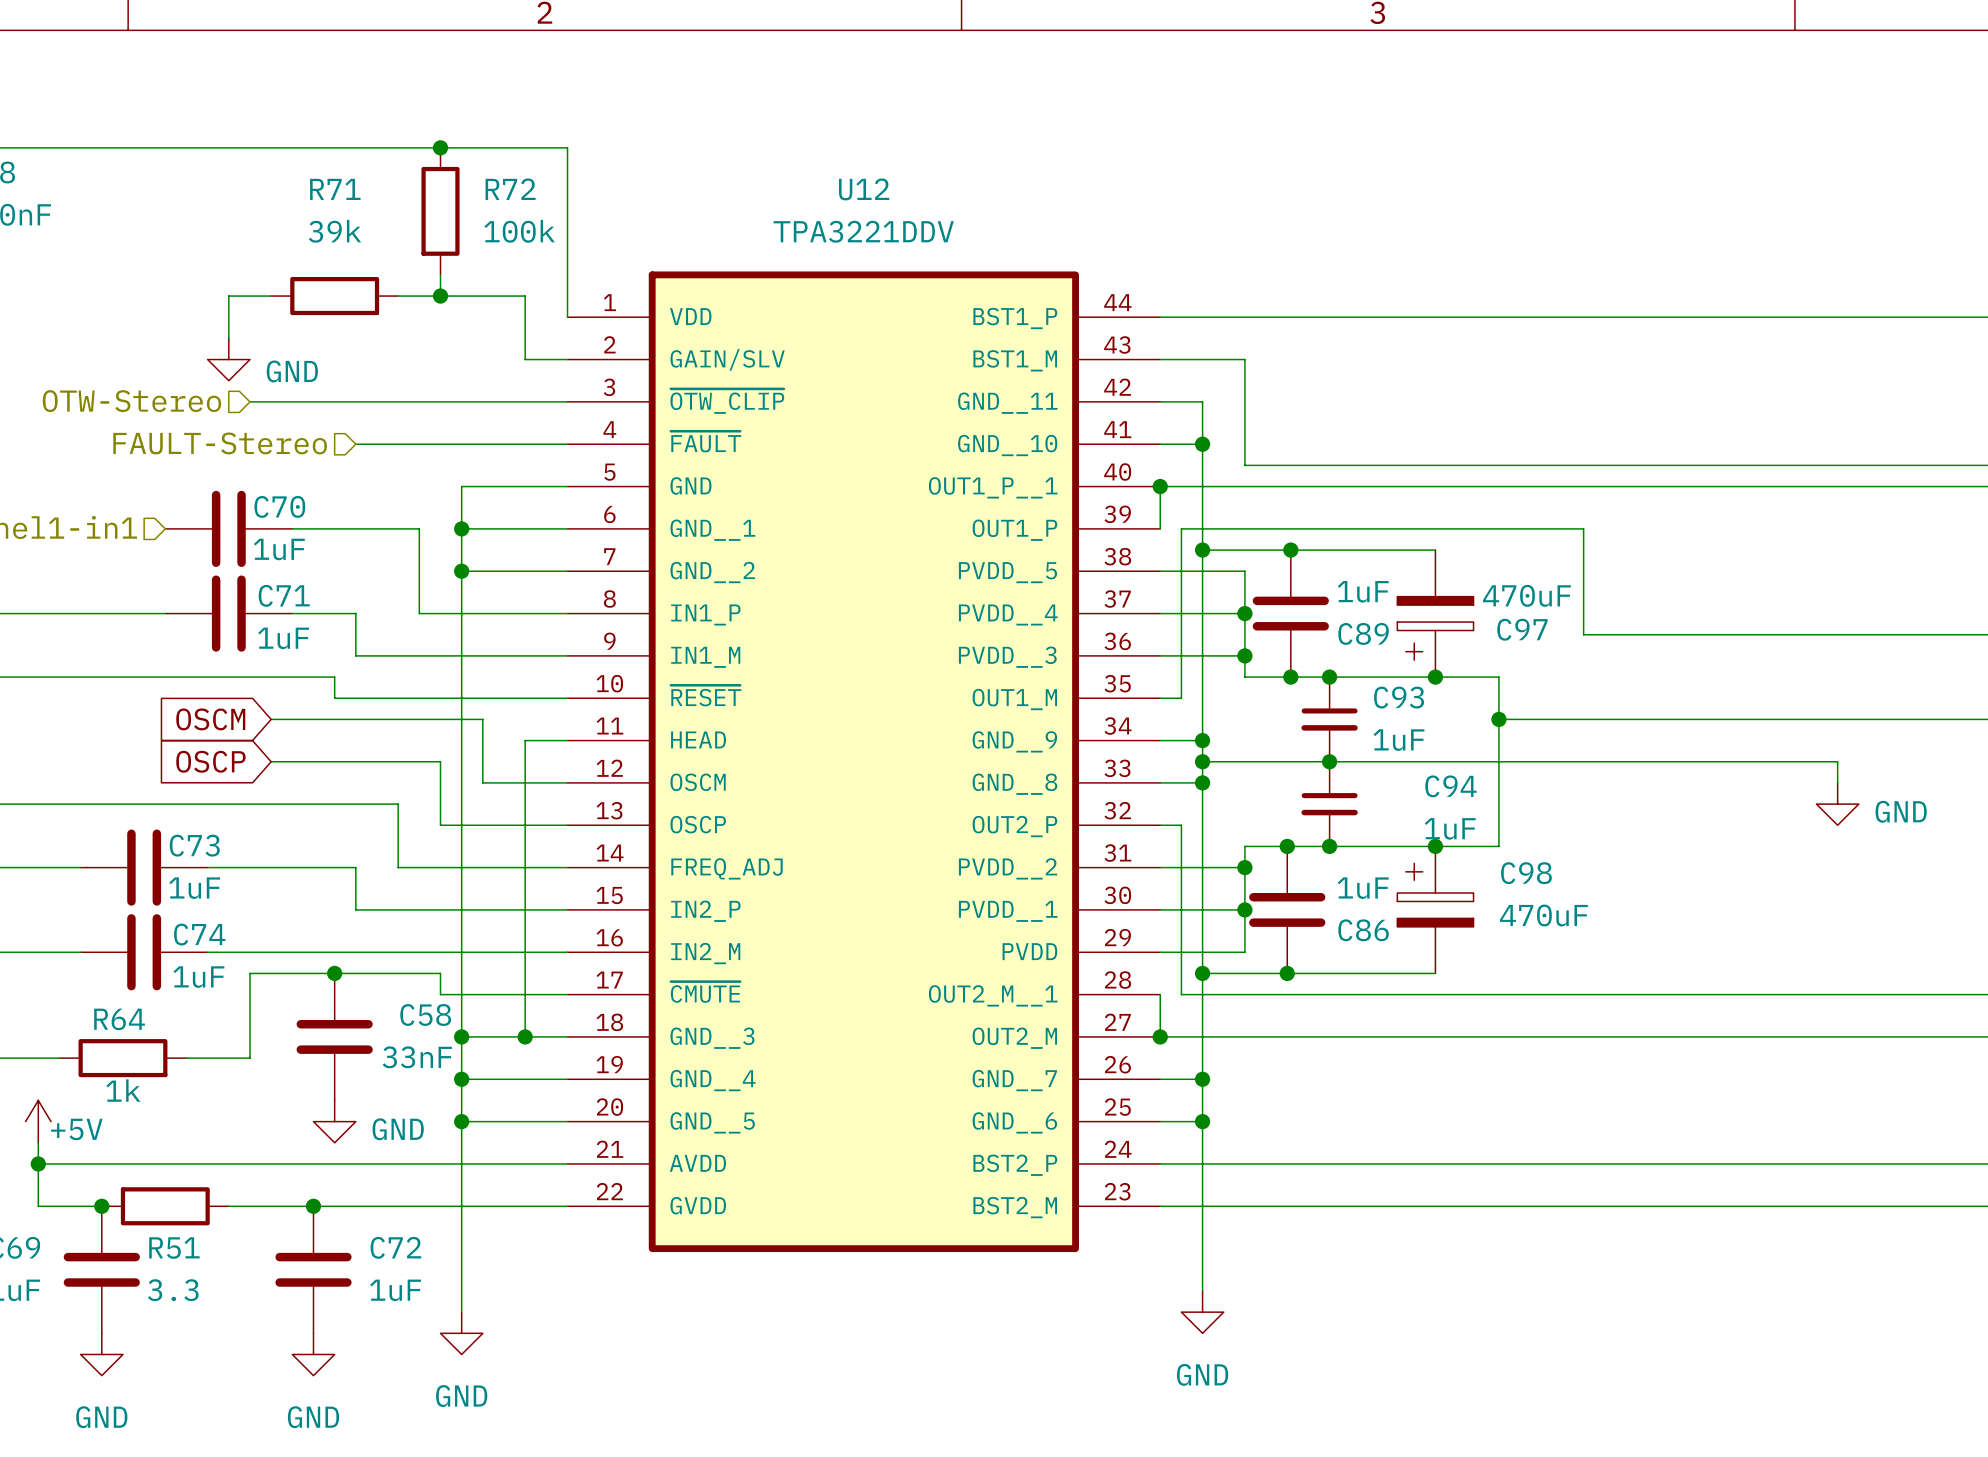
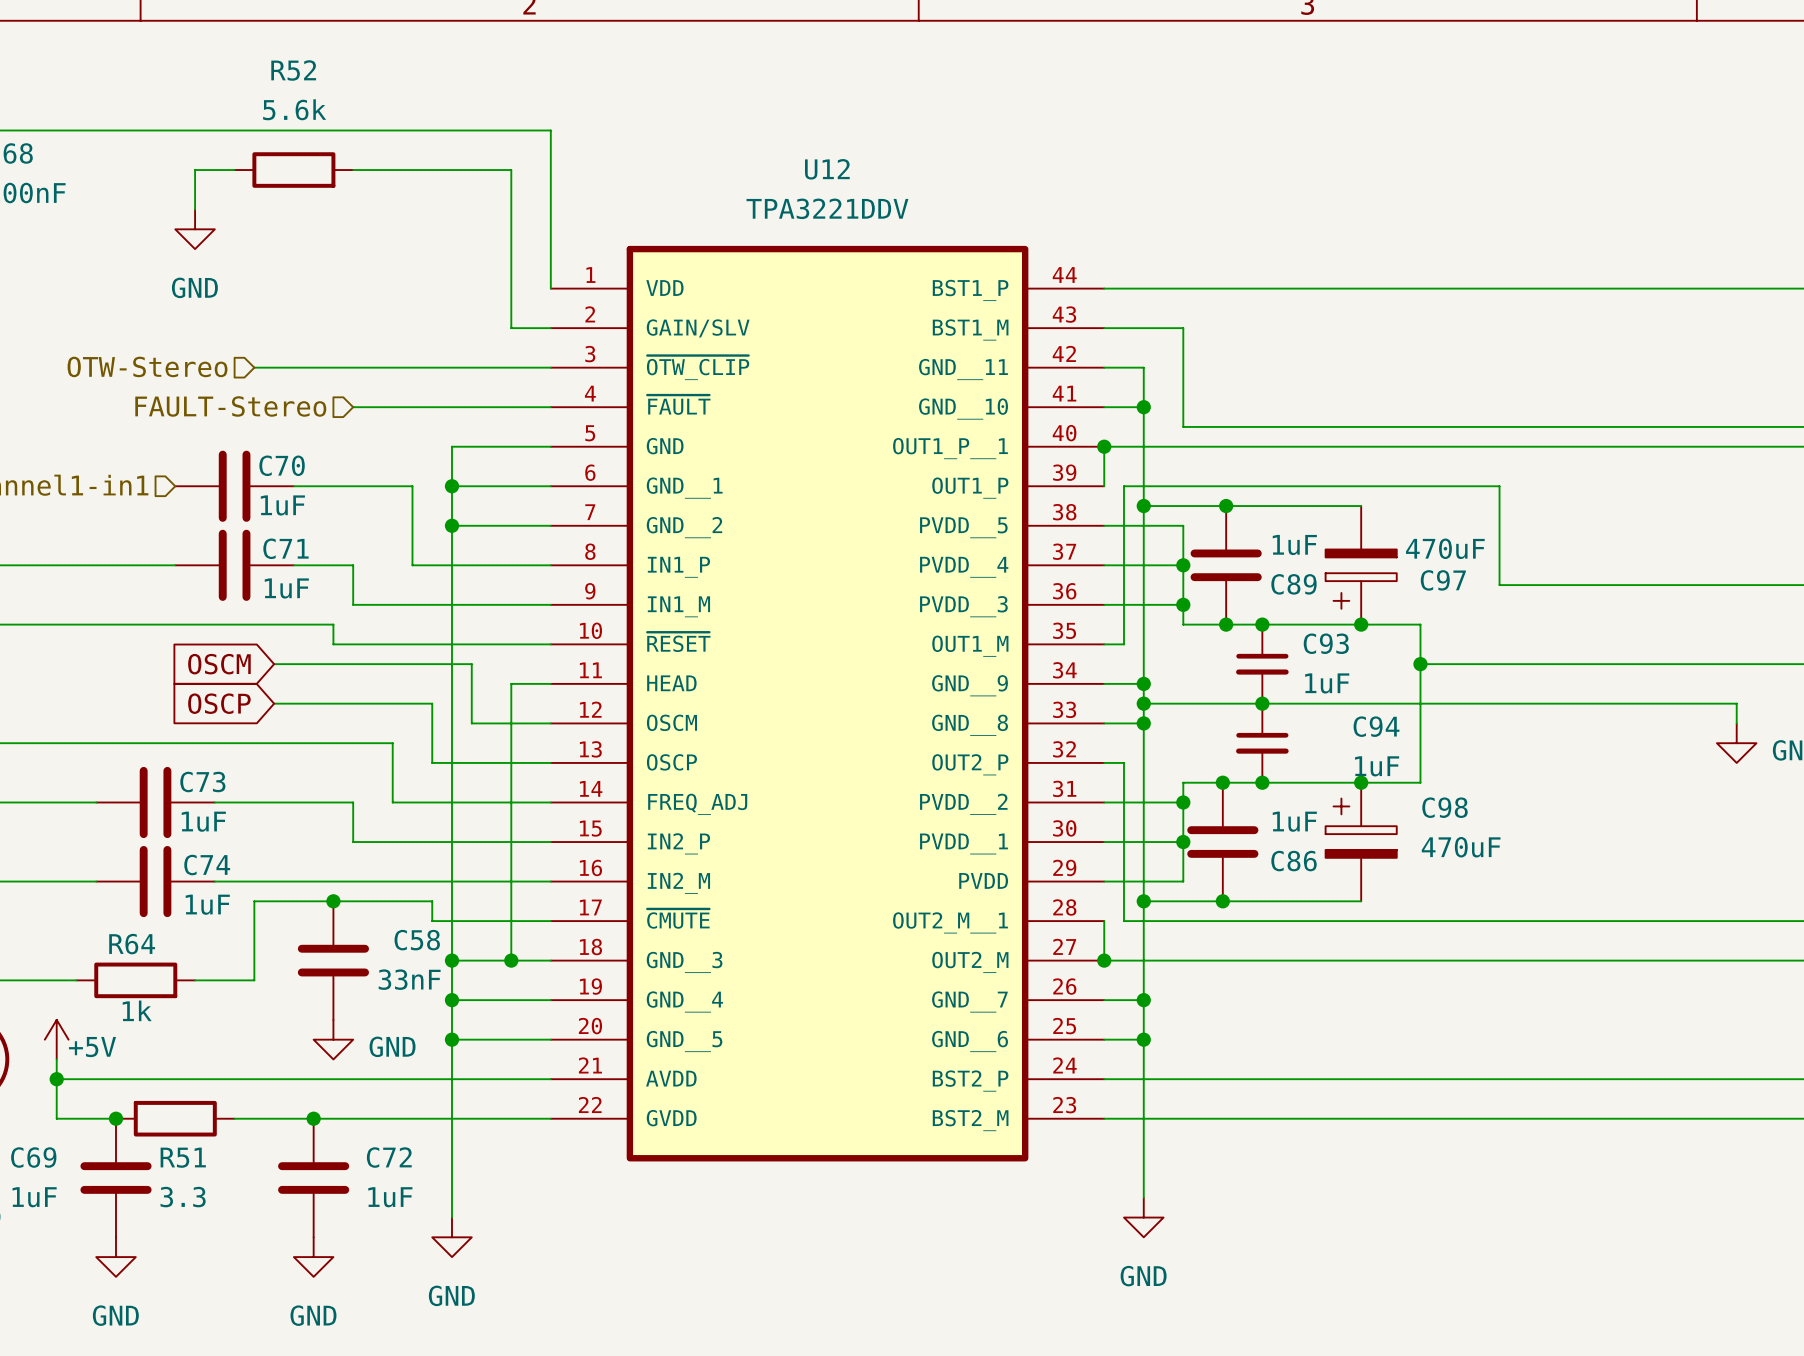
junction: (440, 147) -> none
R52: none -> 5.6k (293, 170)
R72: 100k (440, 211) -> none
wire: (440, 274) (440, 296) -> none
wire: (271, 296) (228, 296) (228, 338) -> (234, 170) (195, 170) (195, 209)
R71: 39k (334, 296) -> none
wire: (398, 296) (525, 296) -> (353, 170) (511, 170) (511, 268)
junction: (440, 296) -> none
power symbol position: GND (228, 359) -> GND (195, 229)
power symbol text position: GND (292, 371) -> GND (194, 287)

